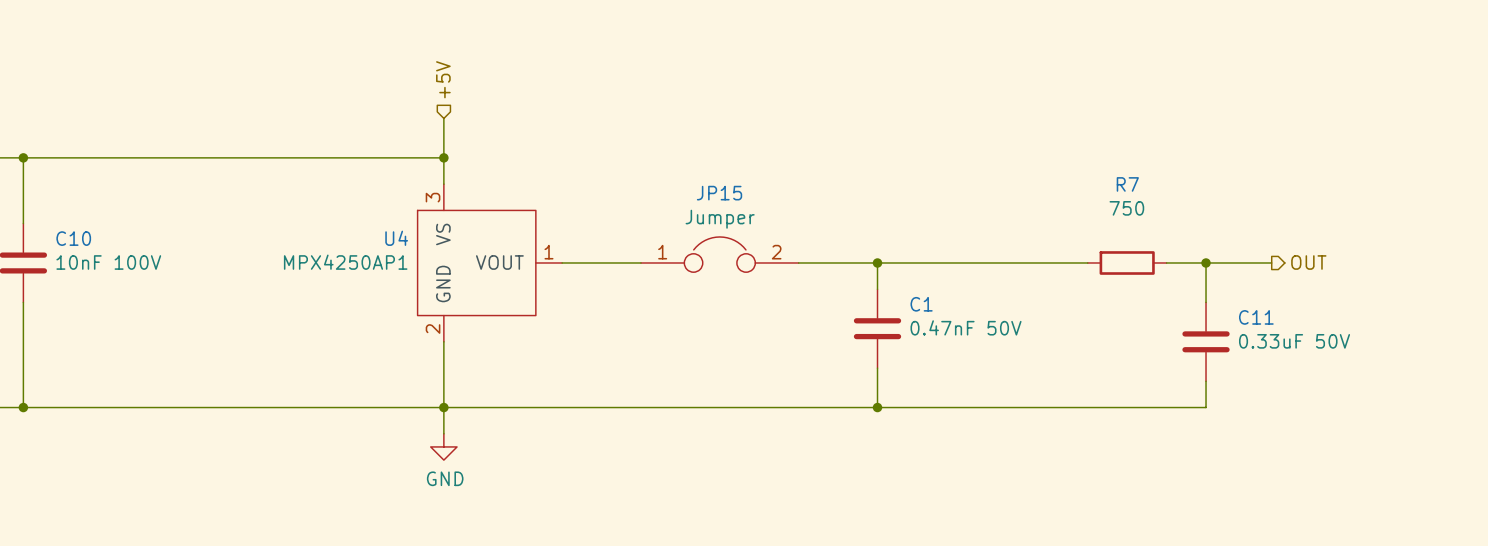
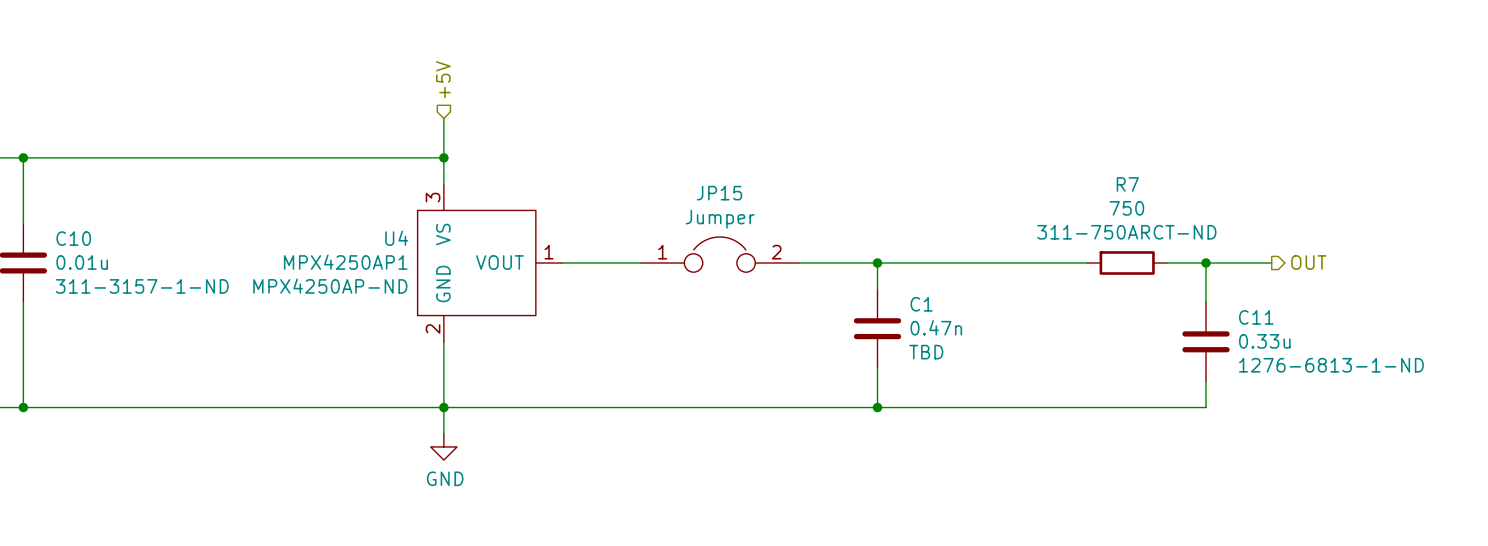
R7 text: none -> 311-750ARCT-ND (1126, 232)
C10 value: 10nF 100V (108, 262) -> 0.01u (82, 262)
C10 text: none -> 311-3157-1-ND (142, 286)
U4 text: none -> MPX4250AP-ND (330, 286)
C1 value: 0.47nF 50V (966, 327) -> 0.47n (936, 327)
C11 value: 0.33uF 50V (1294, 341) -> 0.33u (1264, 341)
C1 text: none -> TBD (926, 352)
C11 text: none -> 1276-6813-1-ND (1331, 365)

